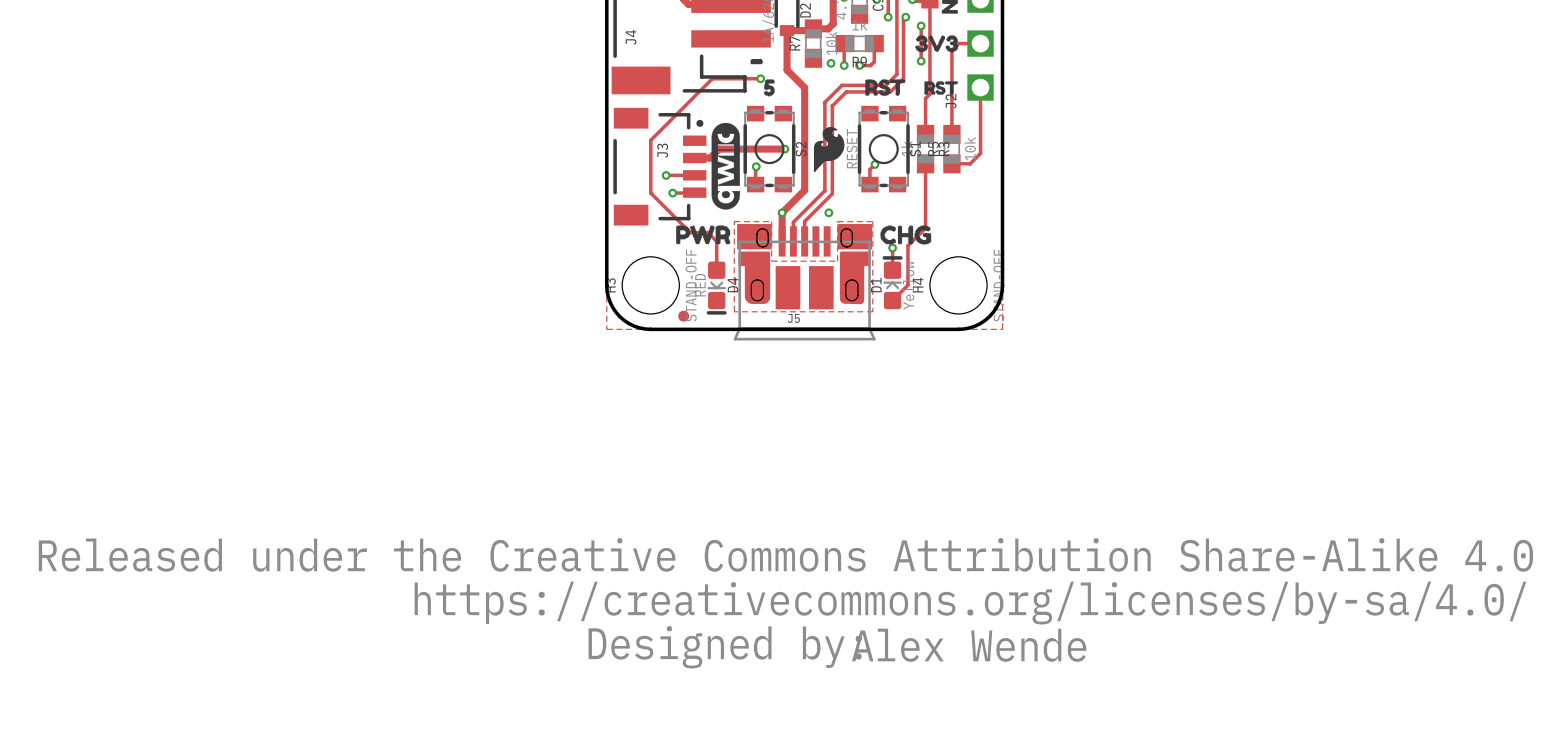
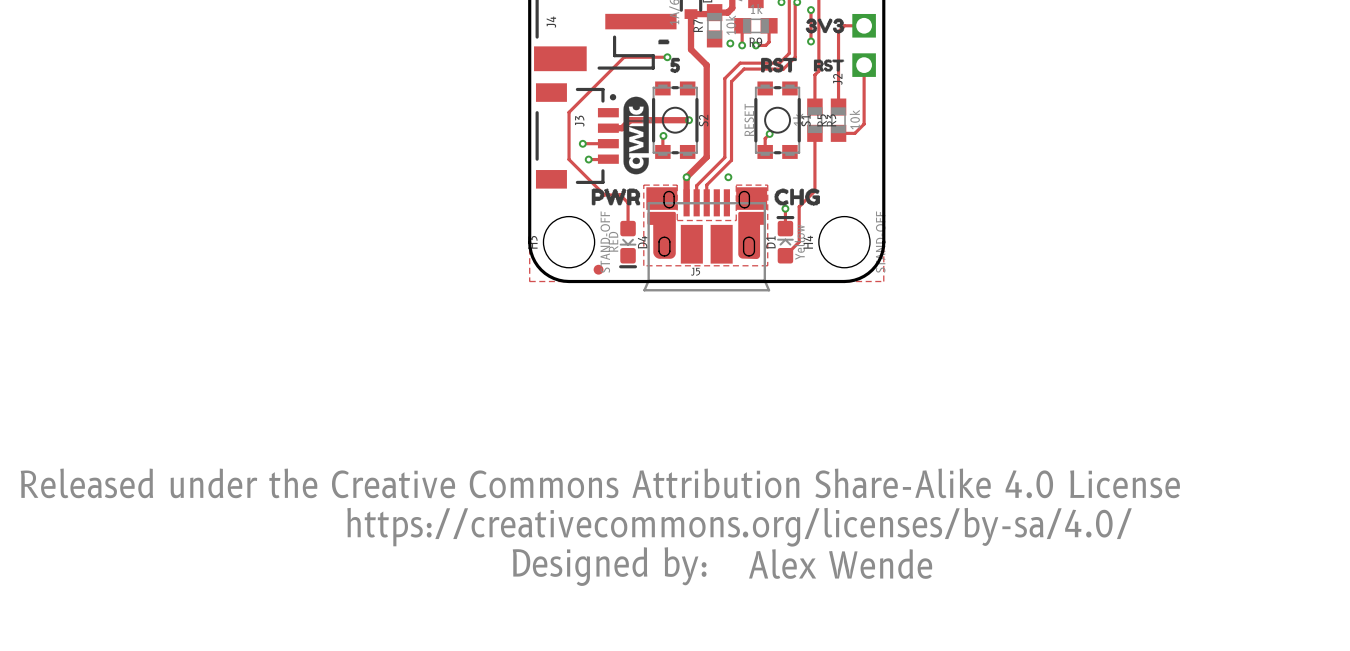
drawing: [813, 126, 845, 173] -> none

